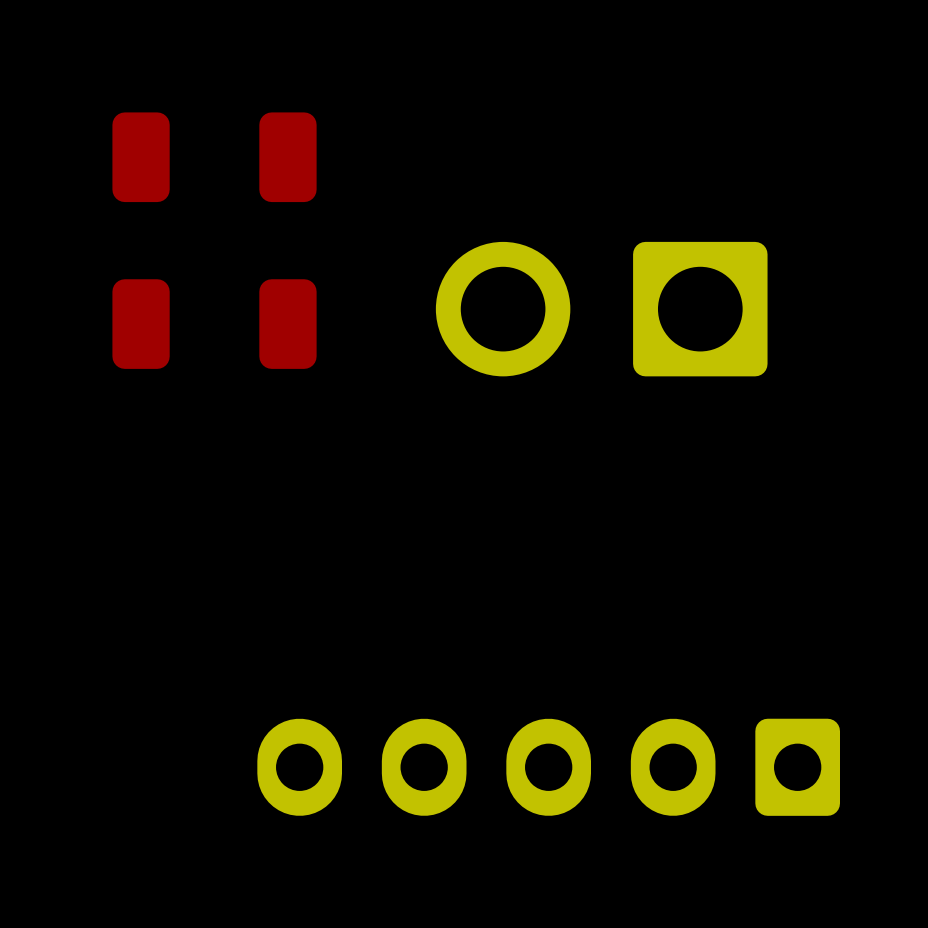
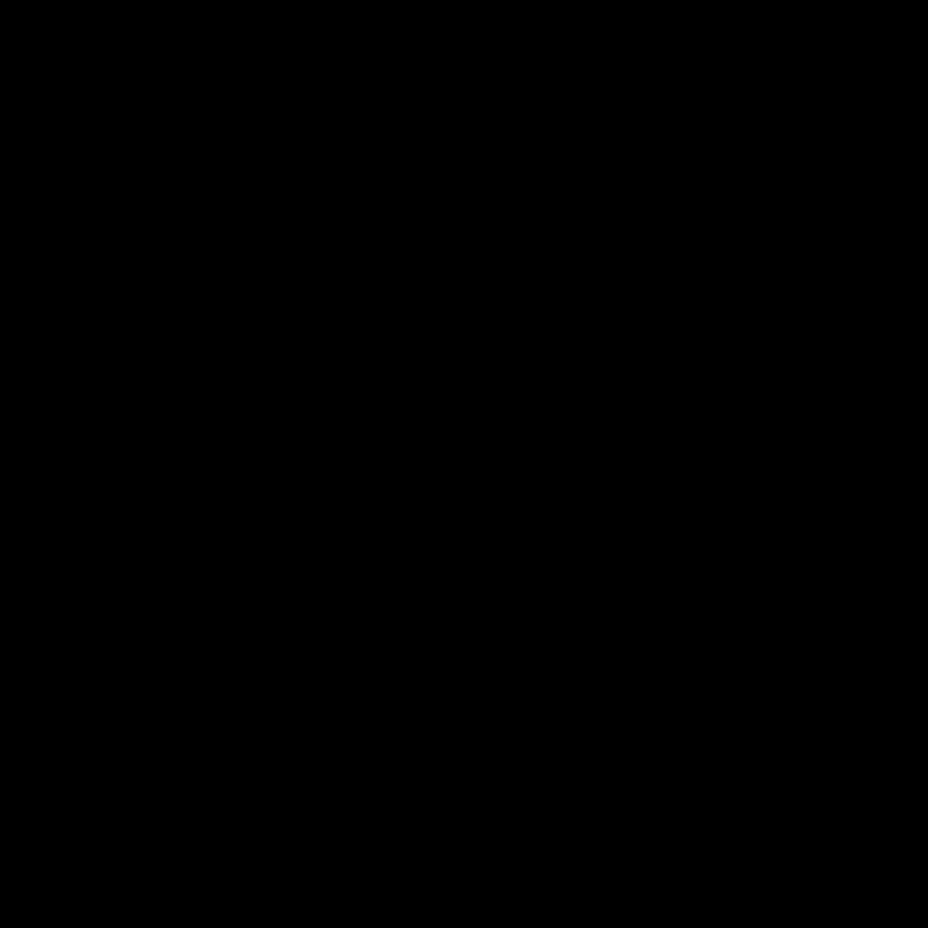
part: (214, 157) -> none
part: (601, 309) -> none
part: (214, 324) -> none
part: (548, 767) -> none

